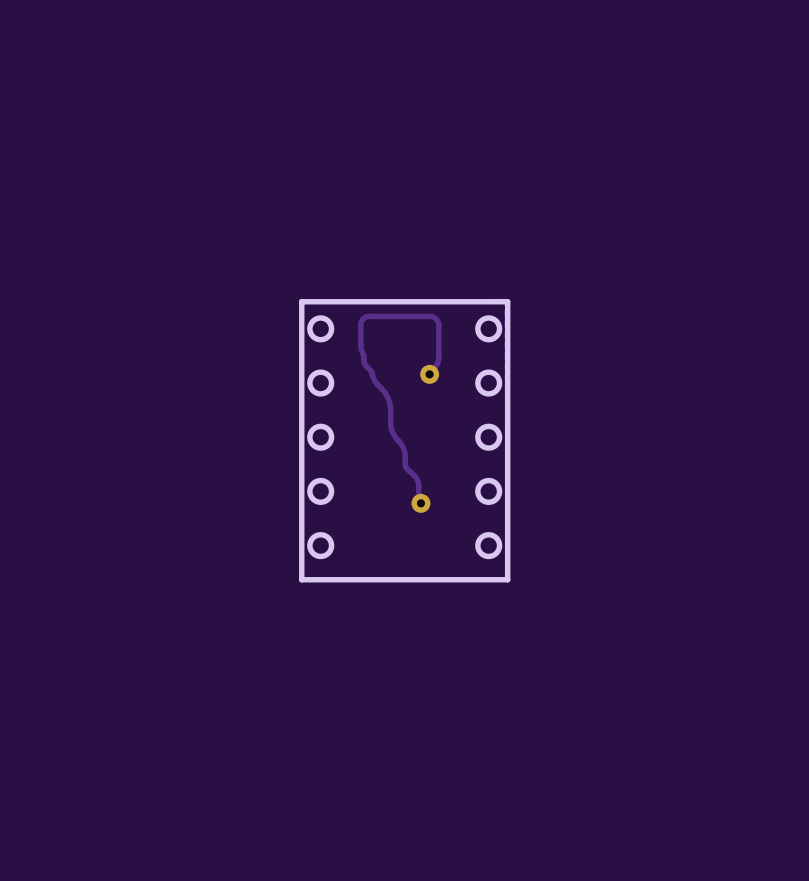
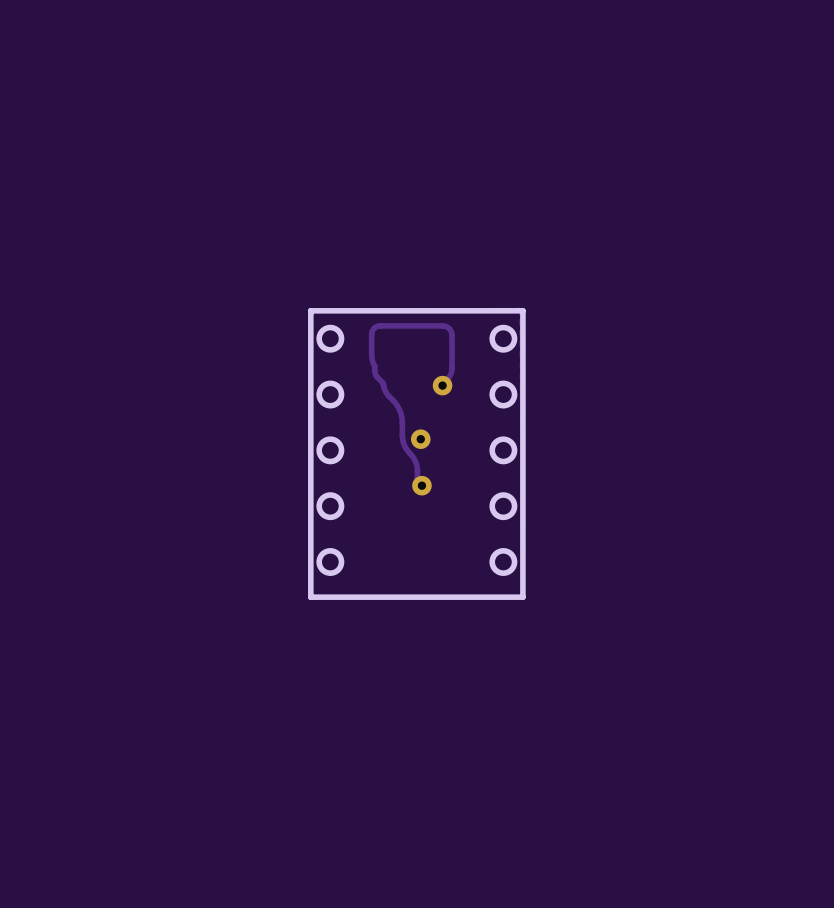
via: none -> (420, 439)
track: (409, 471) (417, 480) (418, 499) (421, 504) -> none
via position: (420, 503) -> (421, 485)

